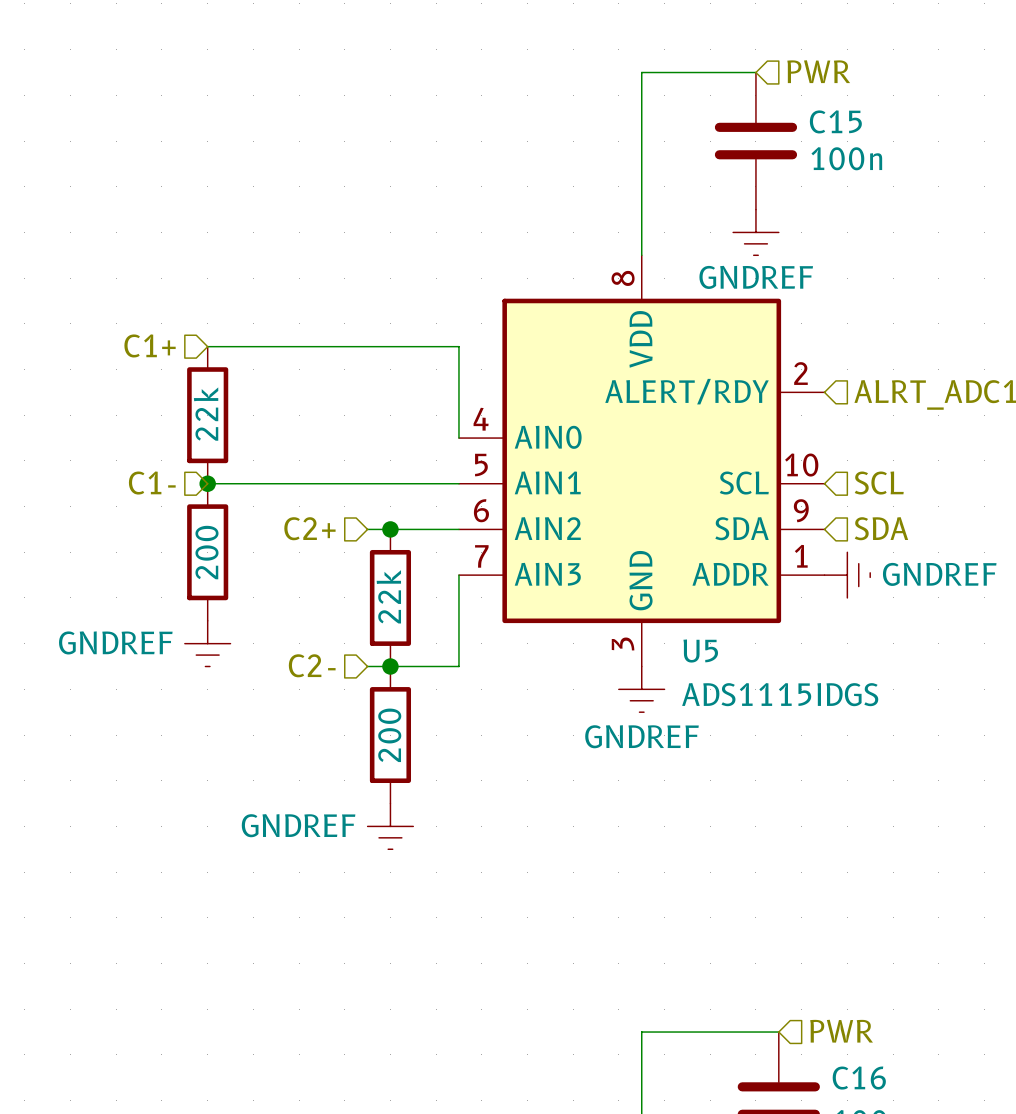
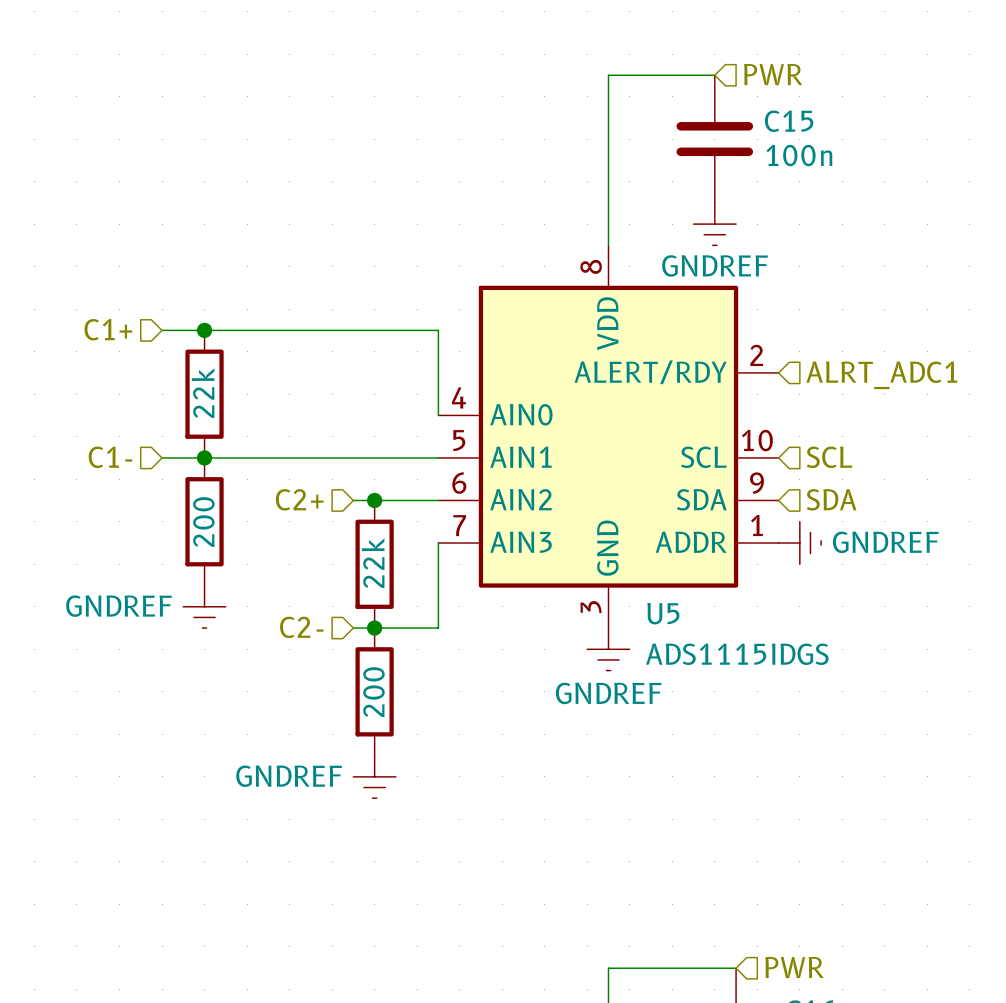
hierarchical label position: C1+ (150, 345) -> C1+ (108, 329)
wire: none -> (162, 330) (204, 330)
junction: none -> (204, 330)
hierarchical label position: C1- (152, 483) -> C1- (110, 457)
wire: none -> (162, 457) (204, 457)

